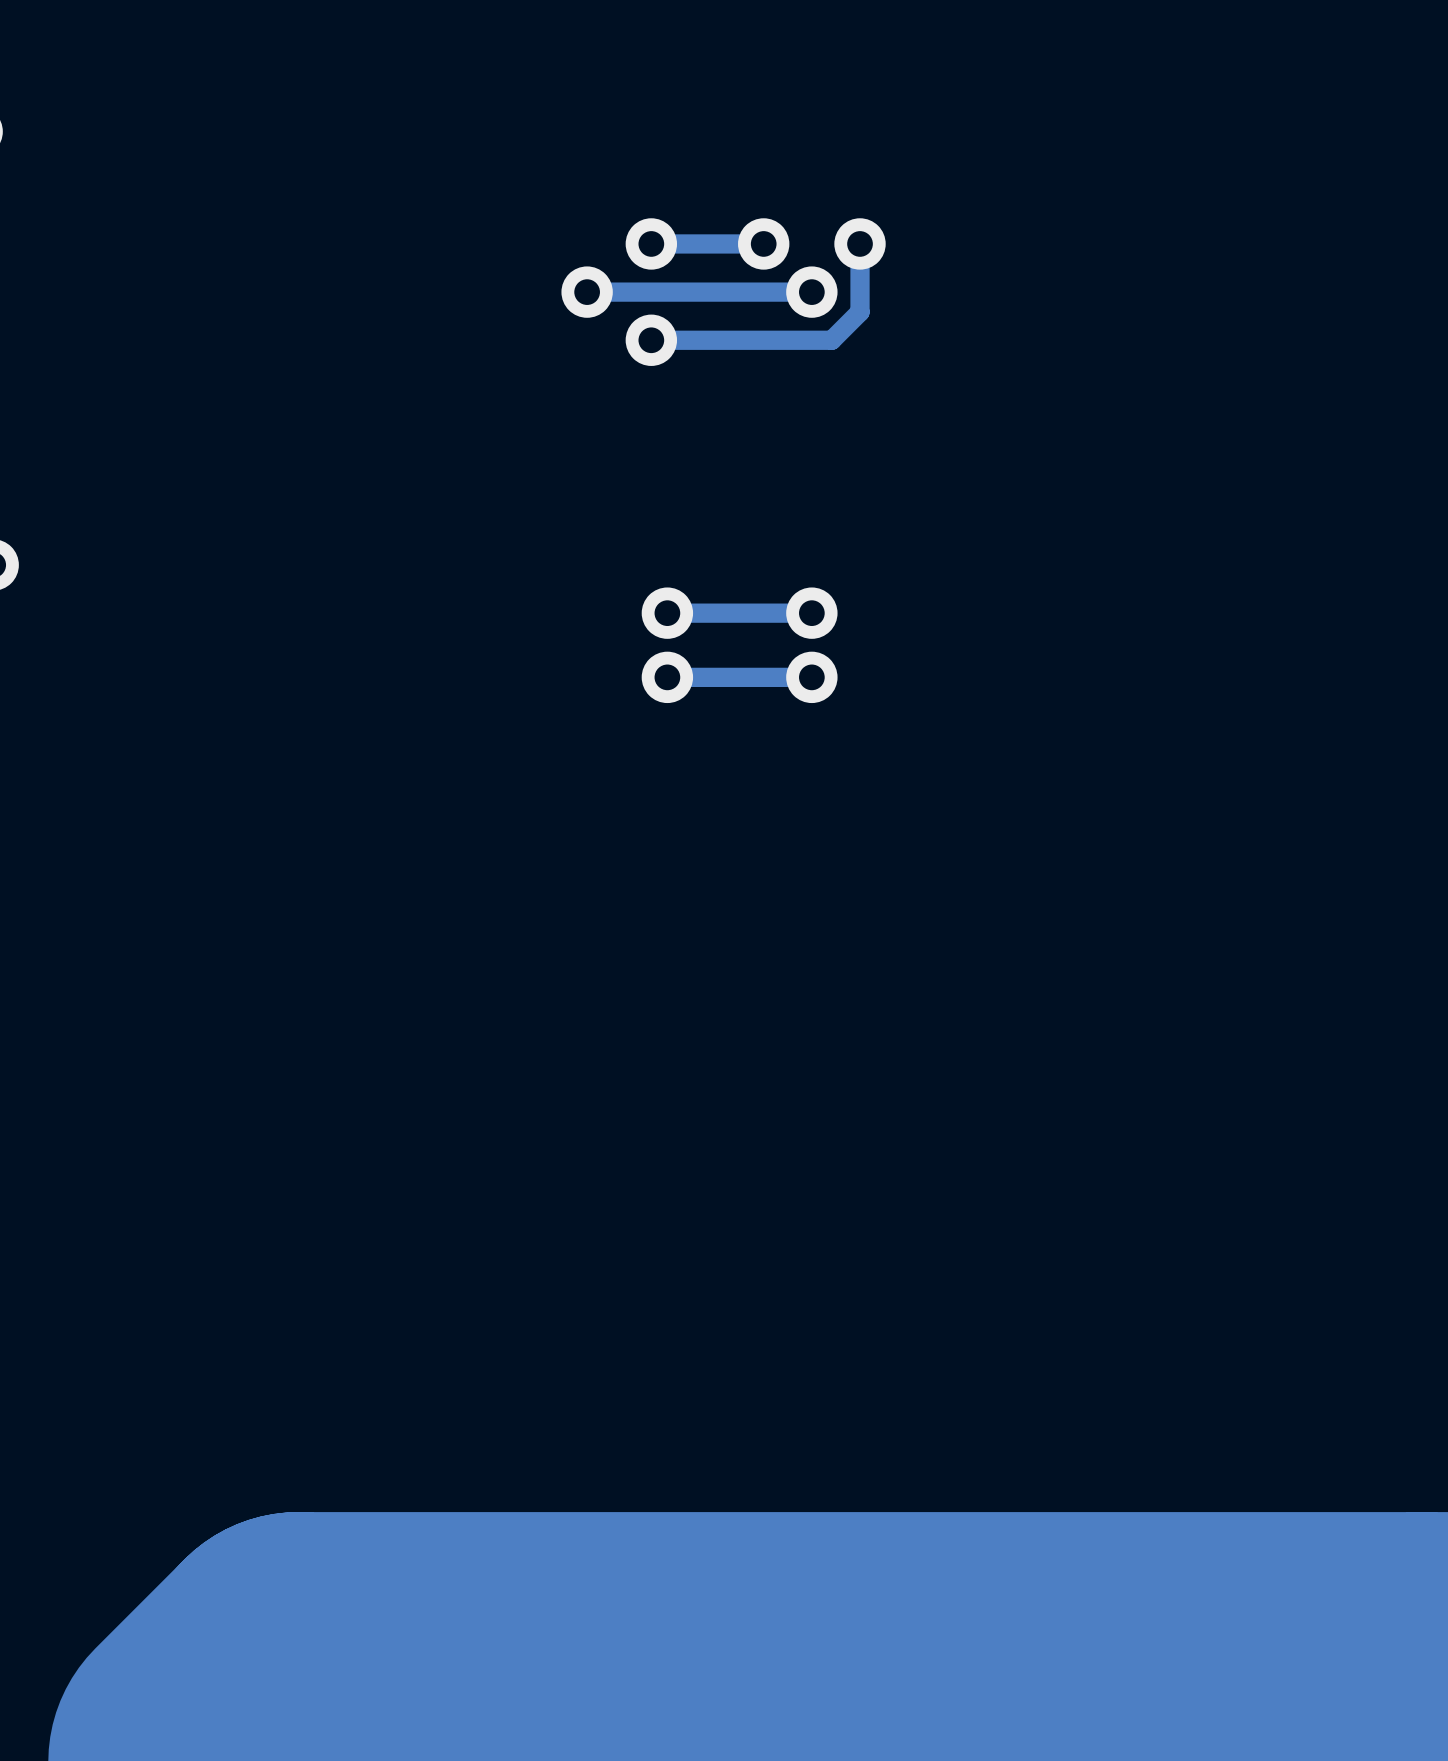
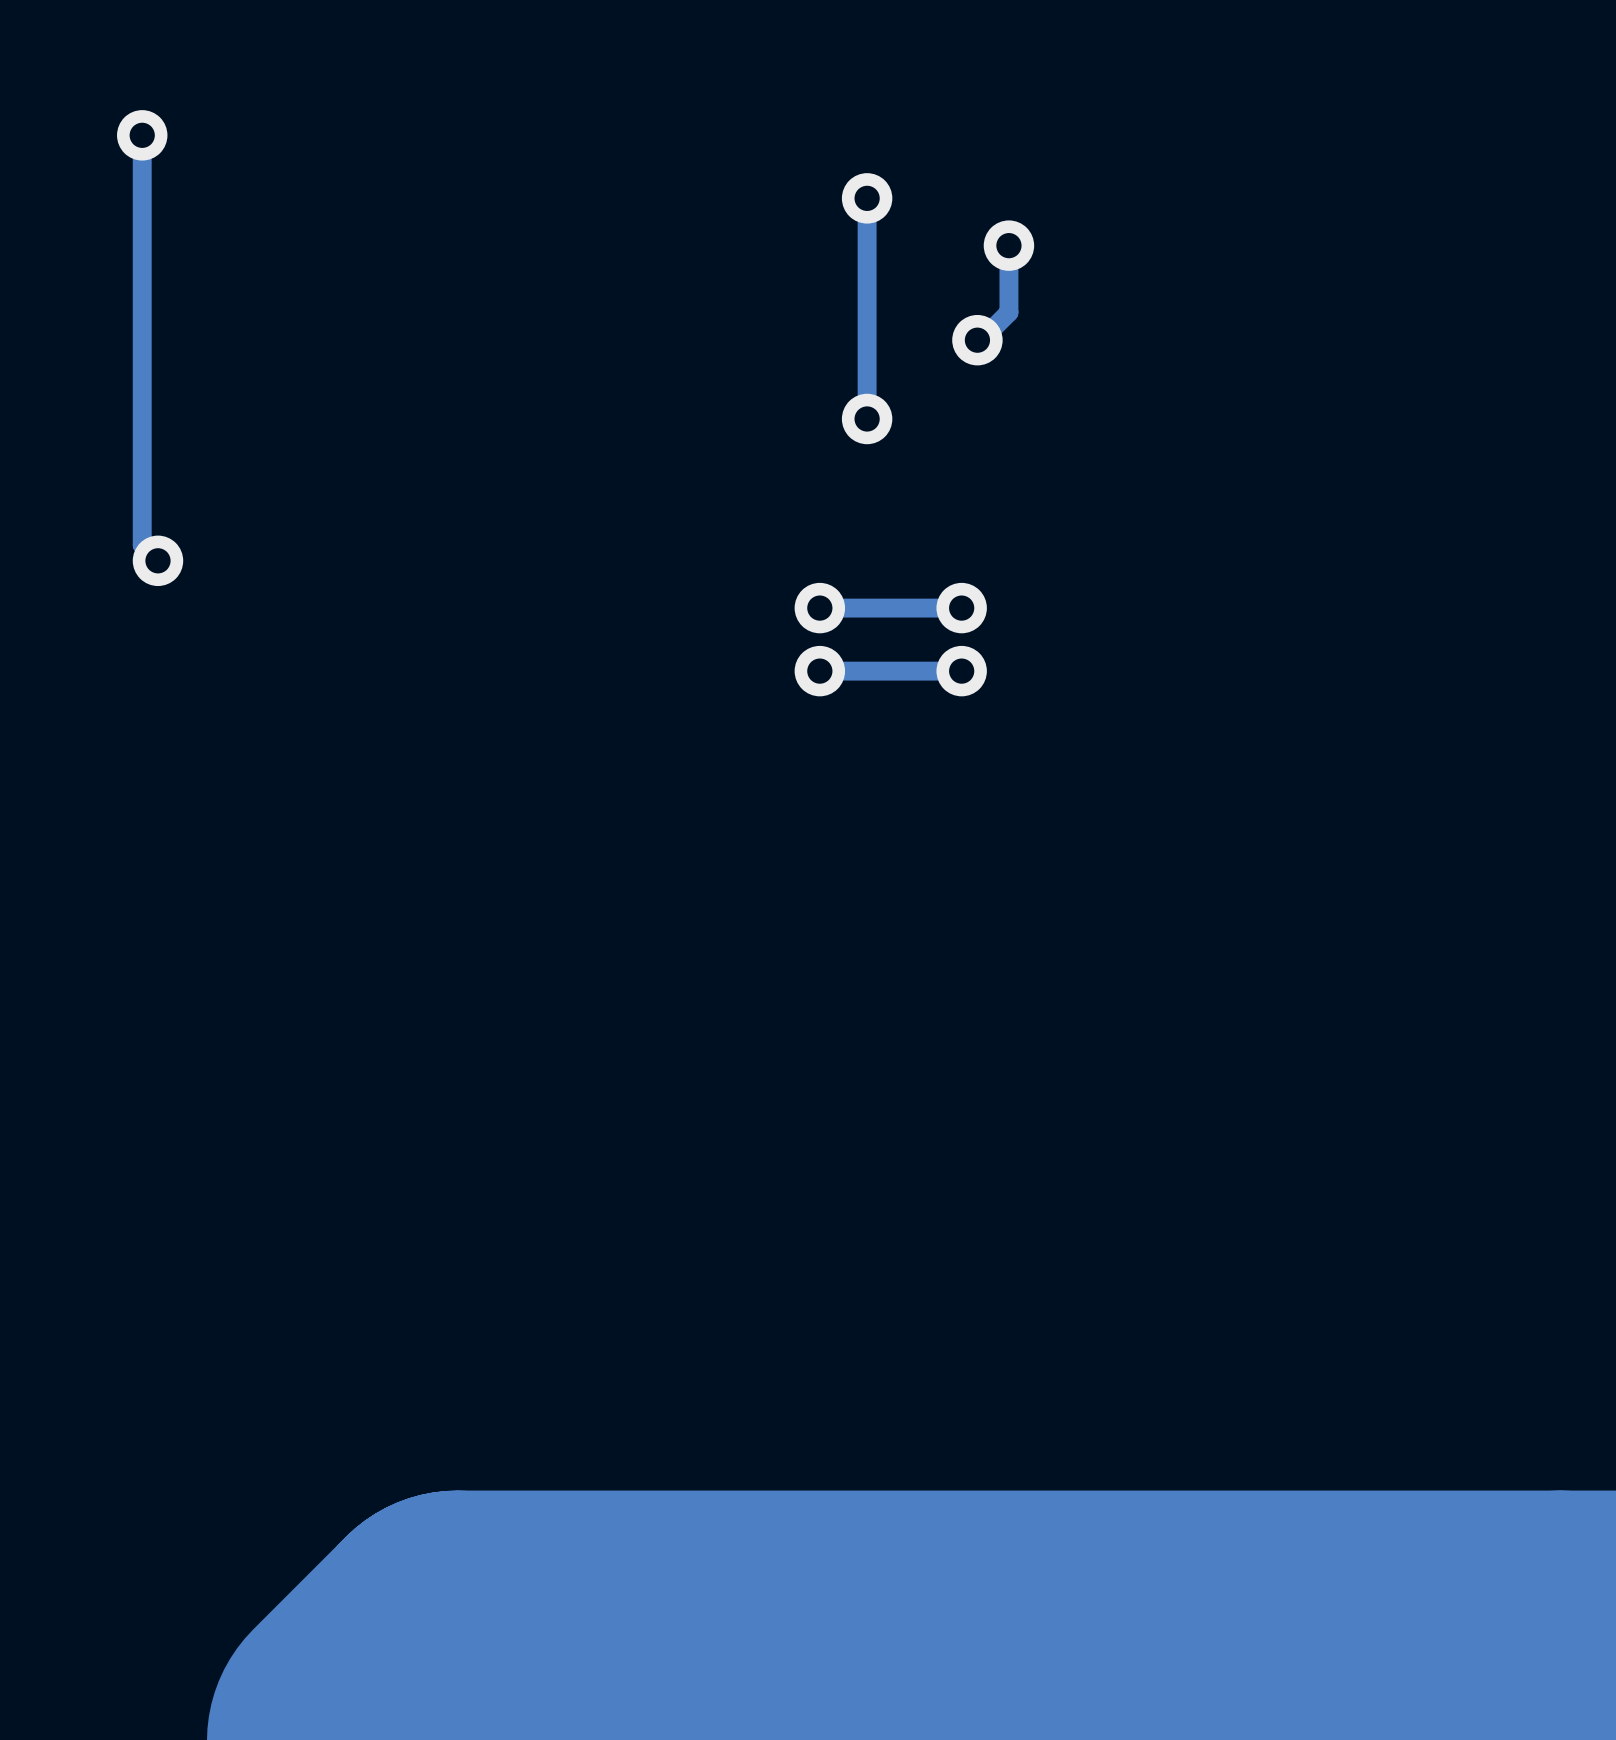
track: none -> (867, 198) (867, 418)
via: none -> (867, 198)
via: (651, 243) -> none
track: (763, 243) (651, 243) -> none
via: (763, 243) -> none
via: (587, 292) -> none
track: (811, 292) (587, 292) -> none
via position: (811, 292) -> (977, 340)
via: (651, 340) -> none
track: (827, 340) (651, 340) -> none
via: none -> (867, 418)

